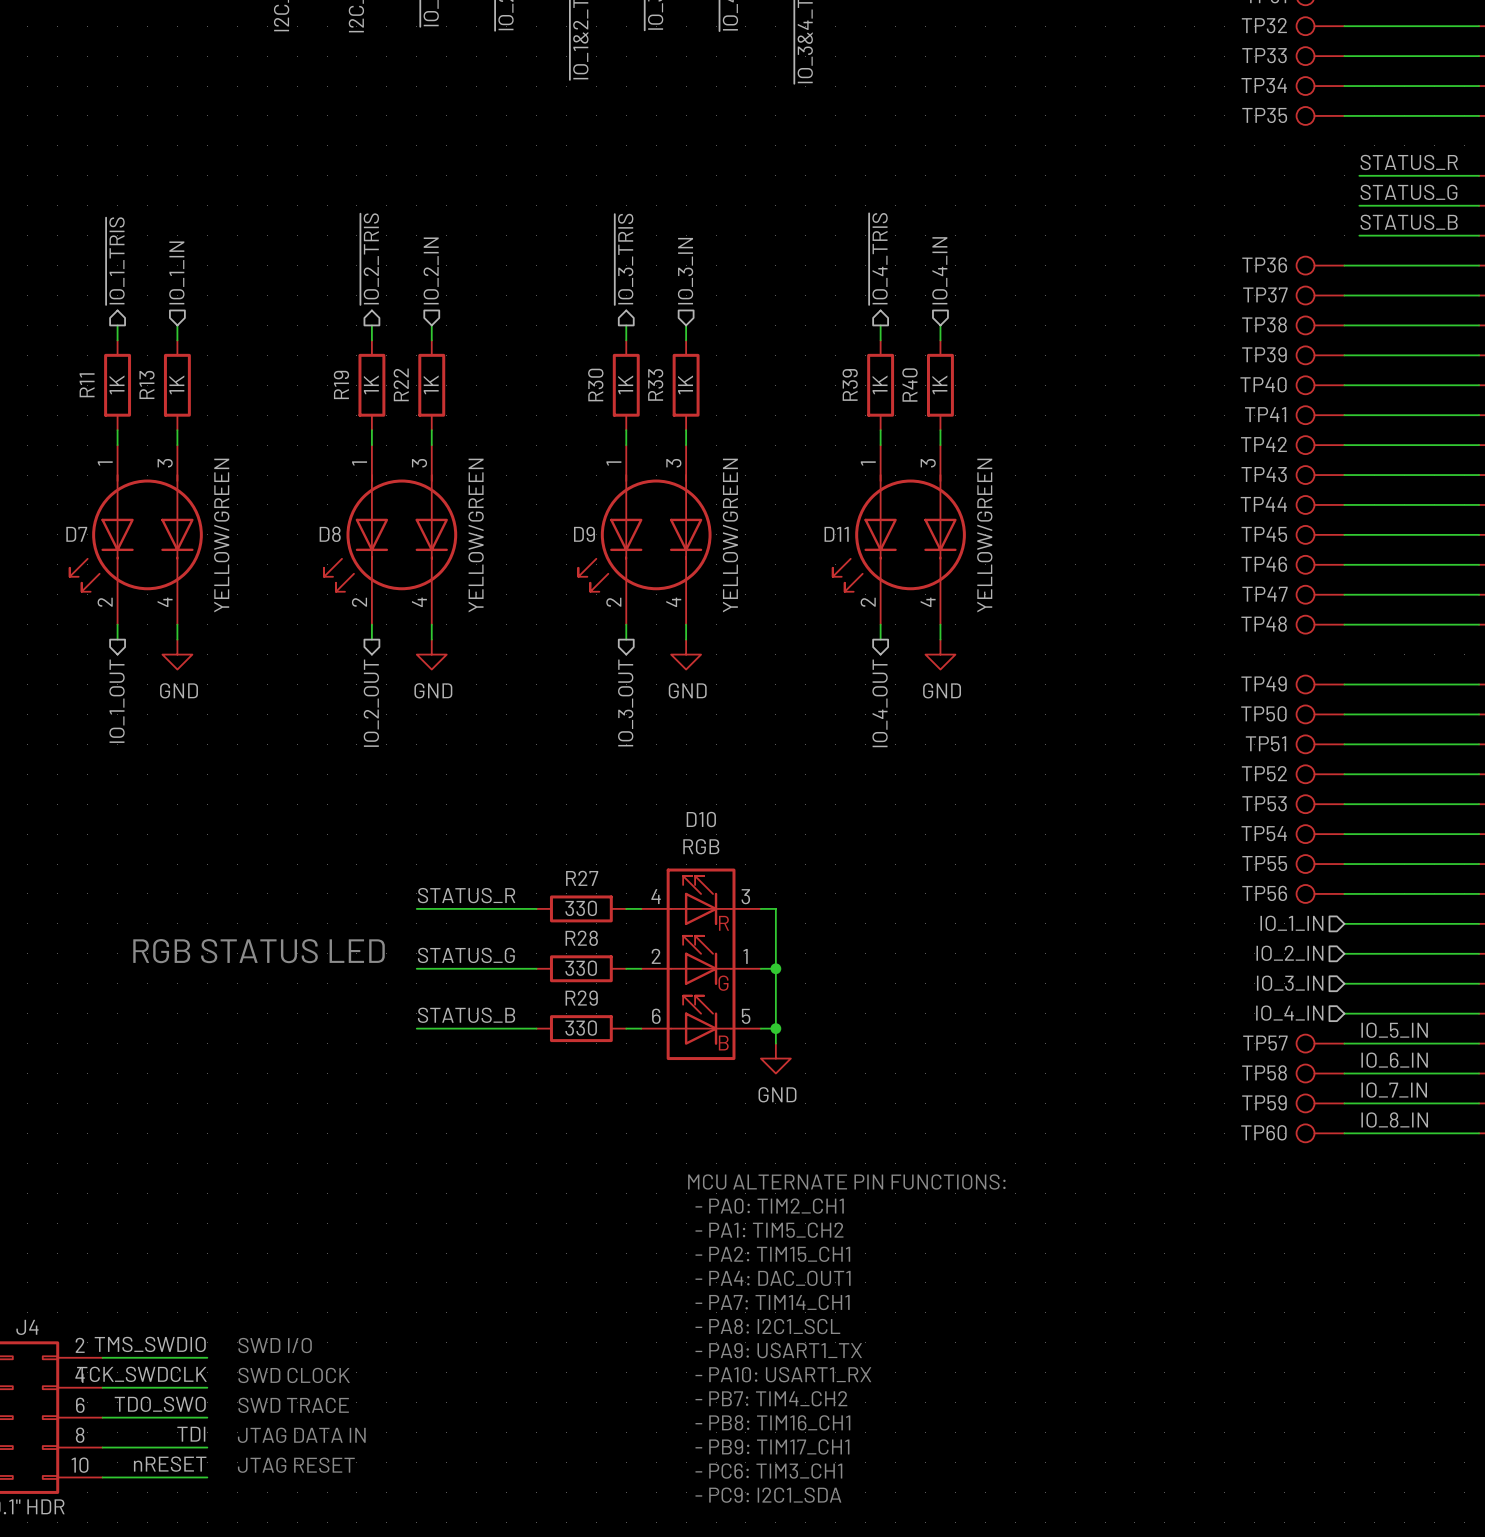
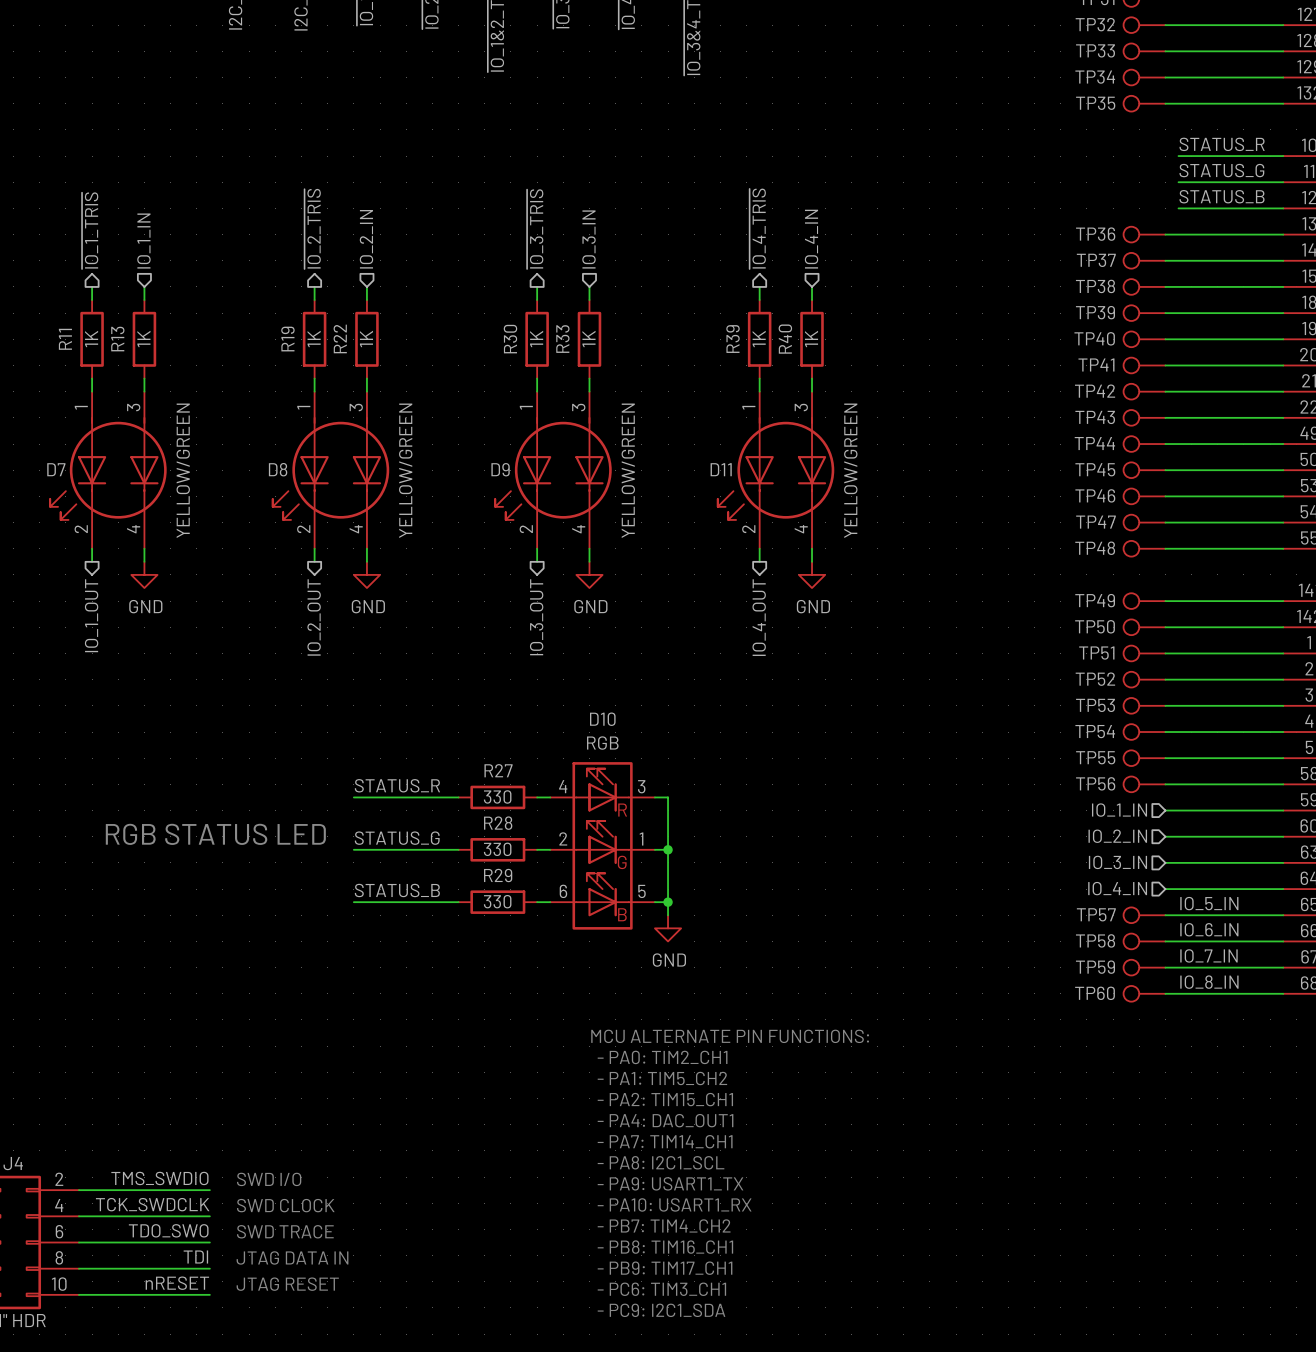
label position: TMS_SWDIO (150, 1344) -> TMS_SWDIO (159, 1178)
text position: SWD I/O (275, 1345) -> SWD I/O (269, 1179)
wire: none -> (170, 1190) (209, 1190)
label position: TCK_SWDCLK (141, 1374) -> TCK_SWDCLK (152, 1204)
text position: SWD CLOCK (294, 1375) -> SWD CLOCK (285, 1205)
wire: none -> (170, 1216) (209, 1216)
label position: TDO_SWO (160, 1404) -> TDO_SWO (168, 1230)
text position: SWD TRACE (293, 1405) -> SWD TRACE (285, 1231)
wire: none -> (170, 1242) (209, 1242)
label position: TDI (191, 1434) -> TDI (195, 1257)
text position: JTAG DATA IN (301, 1435) -> JTAG DATA IN (292, 1257)
wire: none -> (170, 1268) (209, 1268)
label position: nRESET (170, 1464) -> nRESET (177, 1283)
text position: JTAG RESET (296, 1465) -> JTAG RESET (287, 1284)
wire: none -> (170, 1294) (209, 1294)

